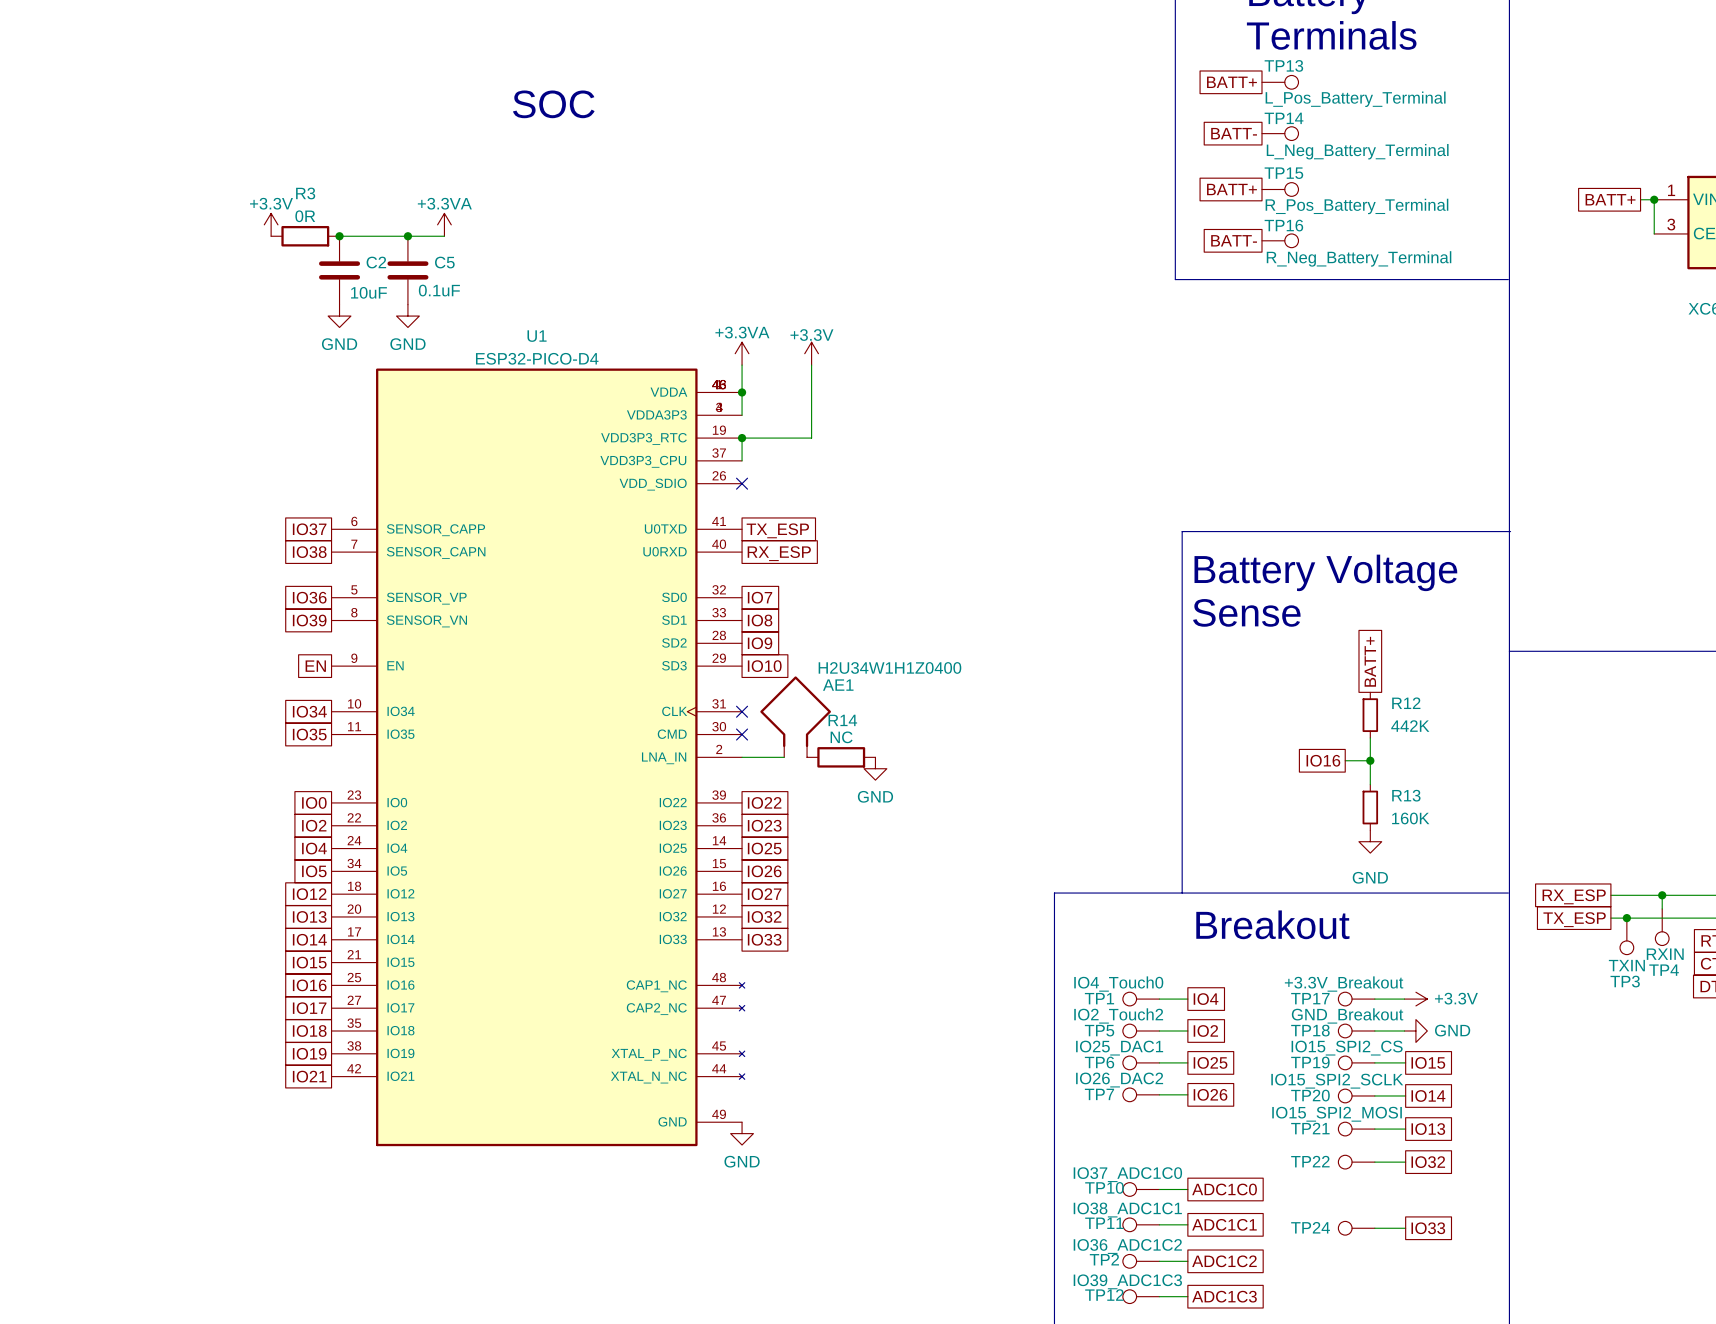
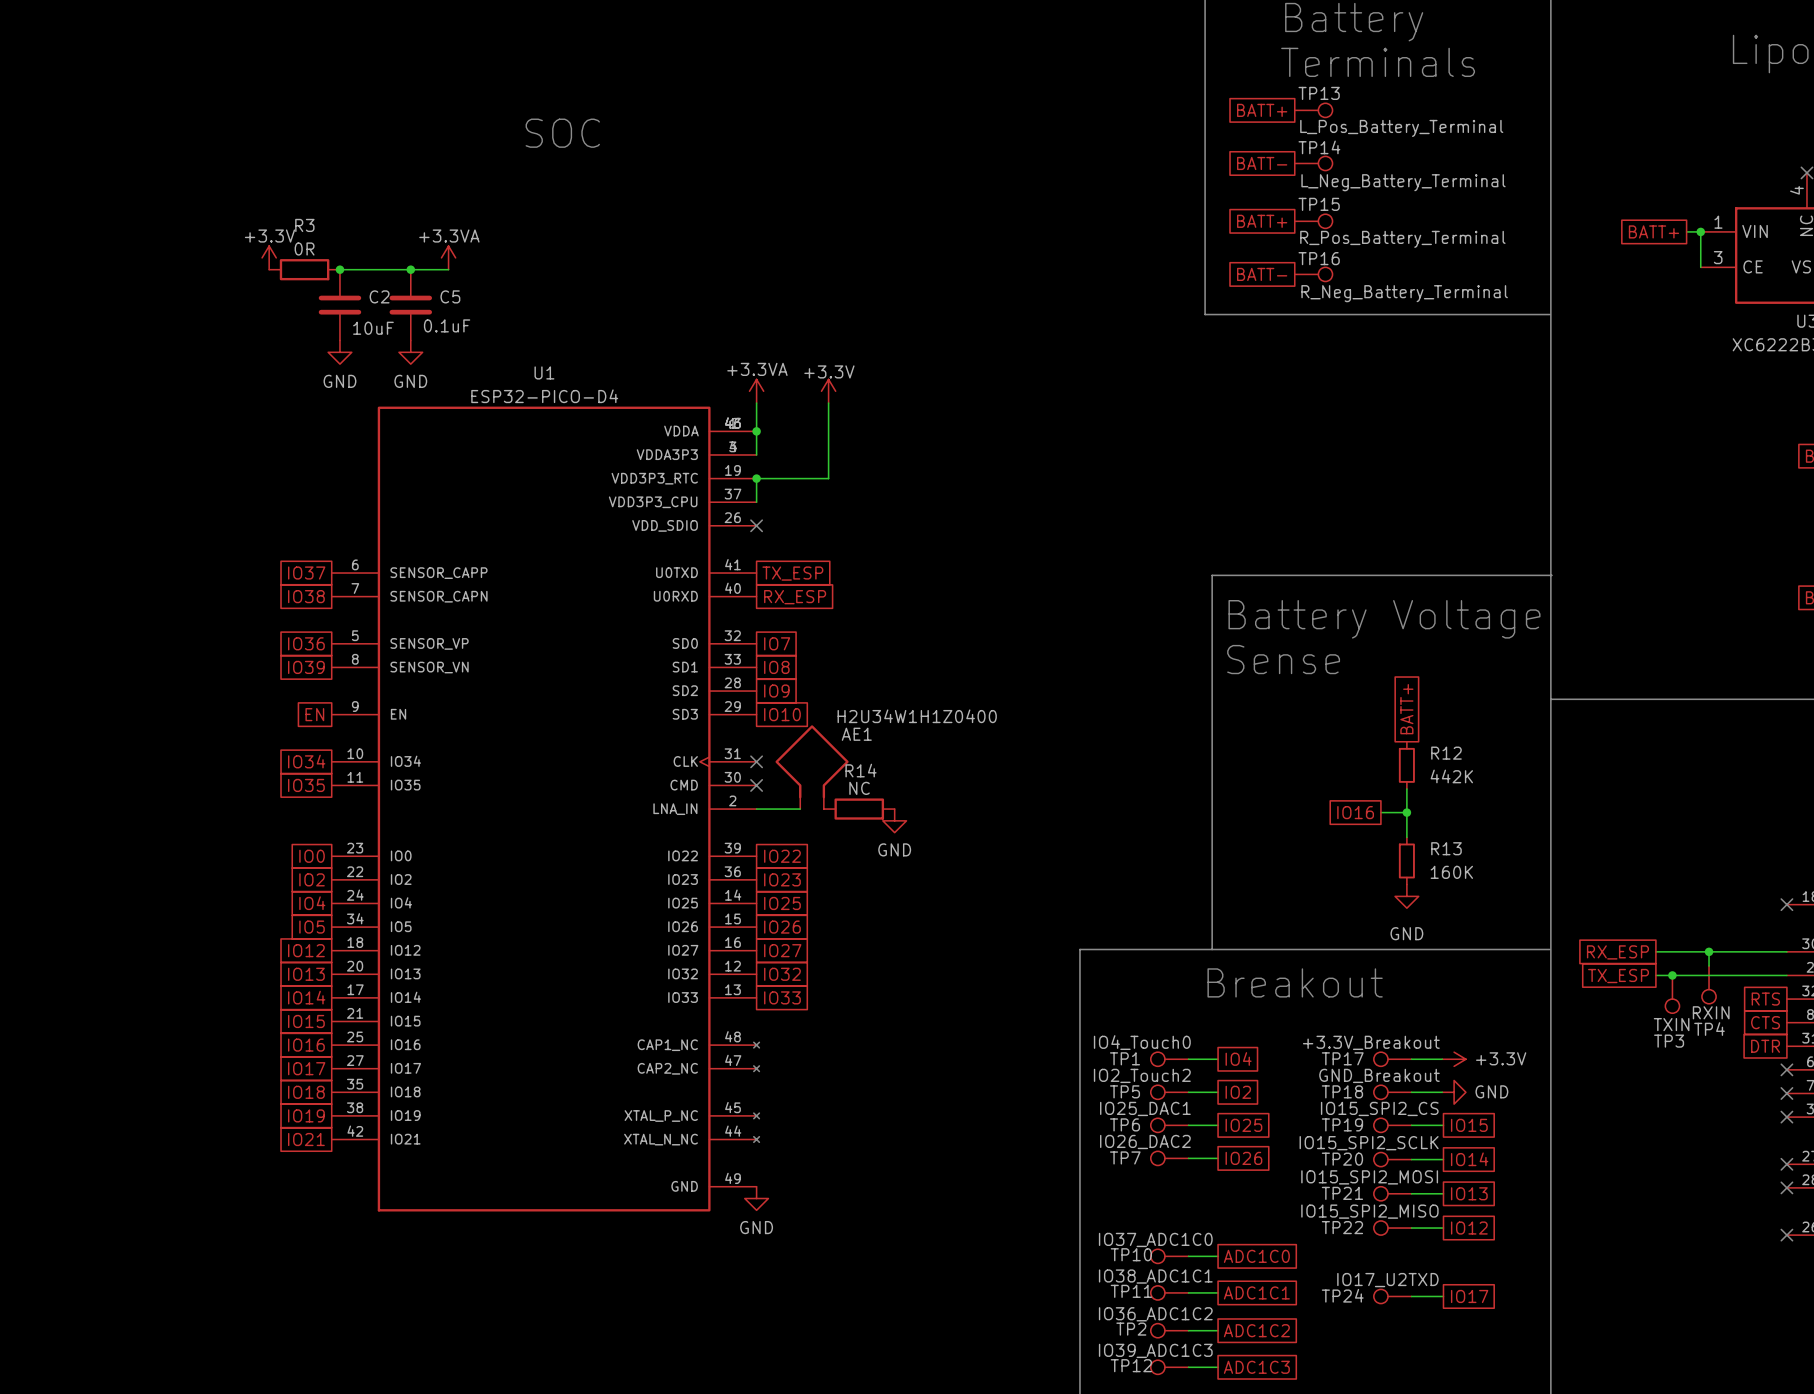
TP22 value: none -> IO15_SPI2_MISO (1369, 1211)
global label: IO32 (1428, 1162) -> IO12 (1469, 1228)
TP24 value: none -> IO17_U2TXD (1387, 1280)
global label: IO33 (1428, 1228) -> IO17 (1469, 1296)

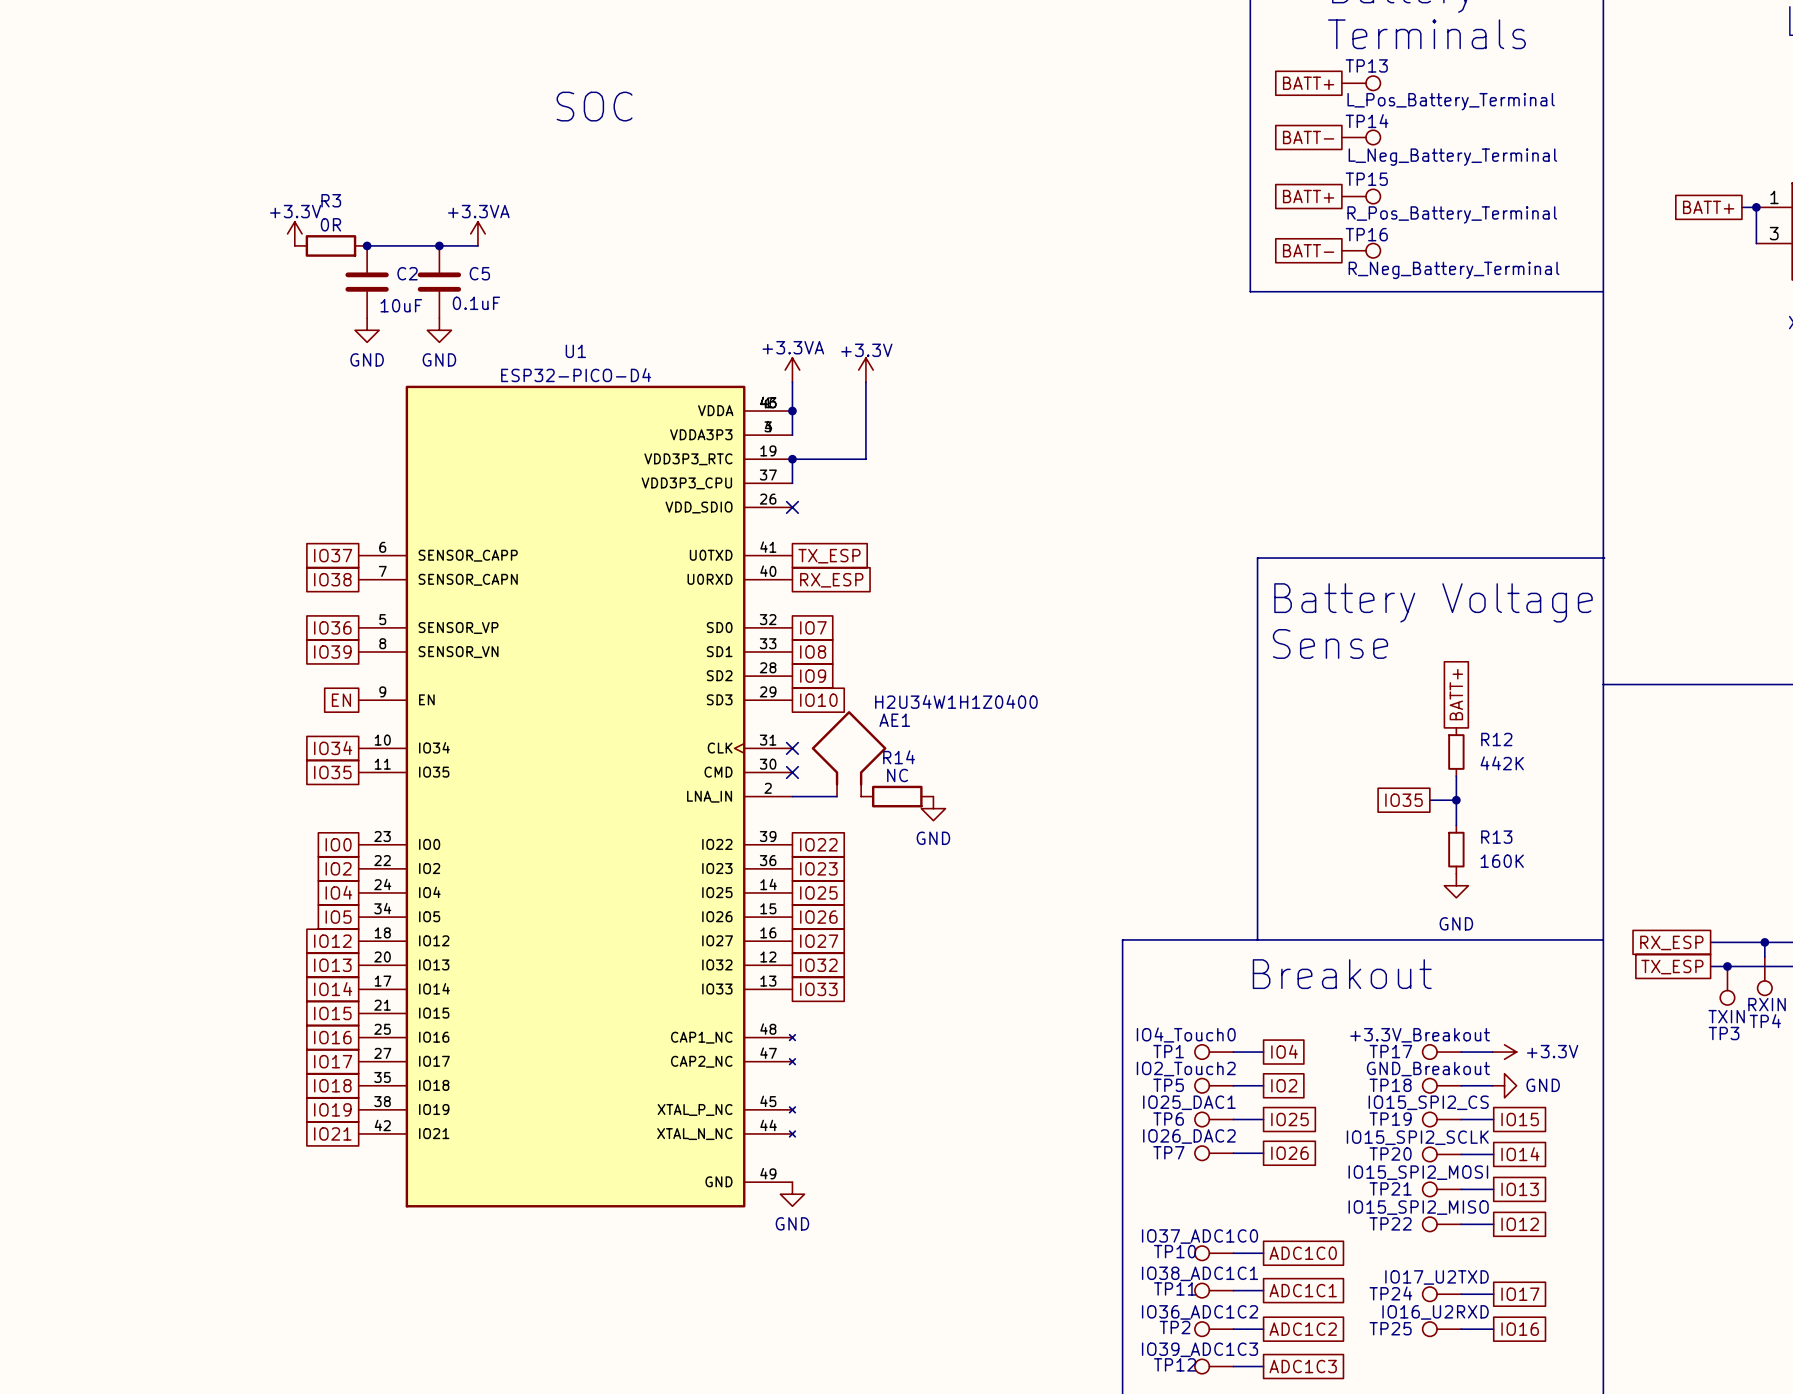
global label: IO16 (1355, 812) -> IO35 (1404, 800)
TP25: none -> IO16_U2RXD (1441, 1329)
wire: none -> (1461, 1329) (1493, 1329)
global label: none -> IO16 (1520, 1329)

